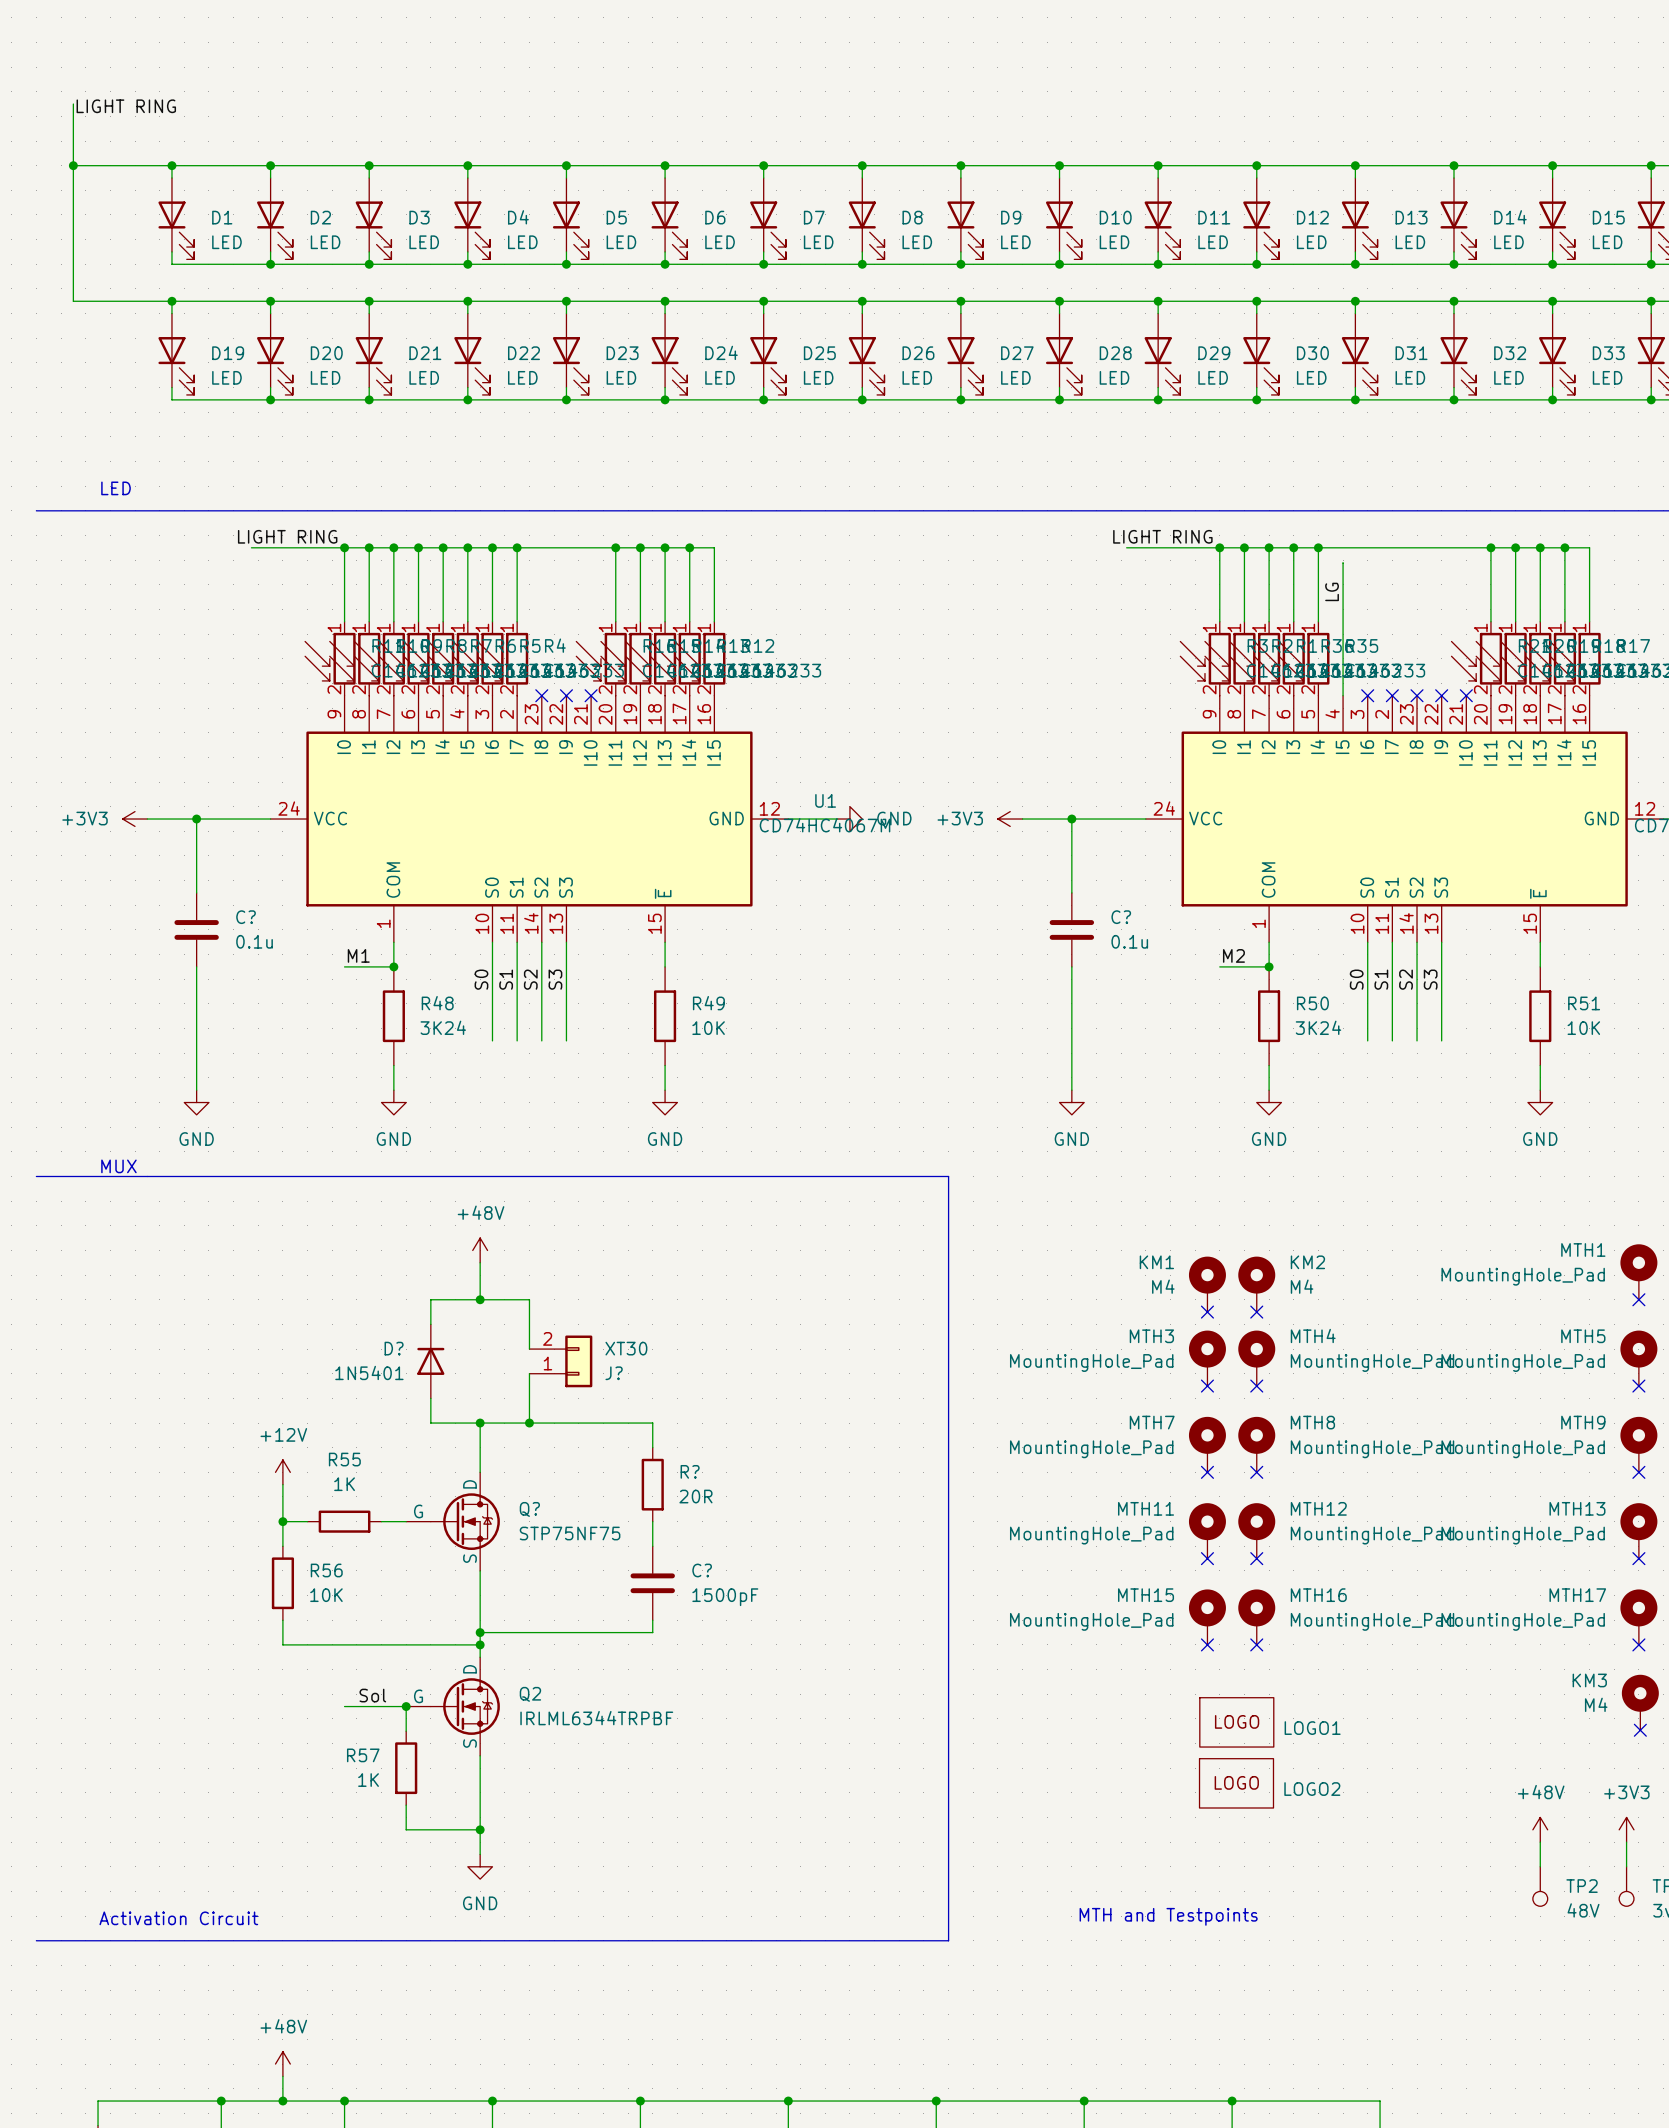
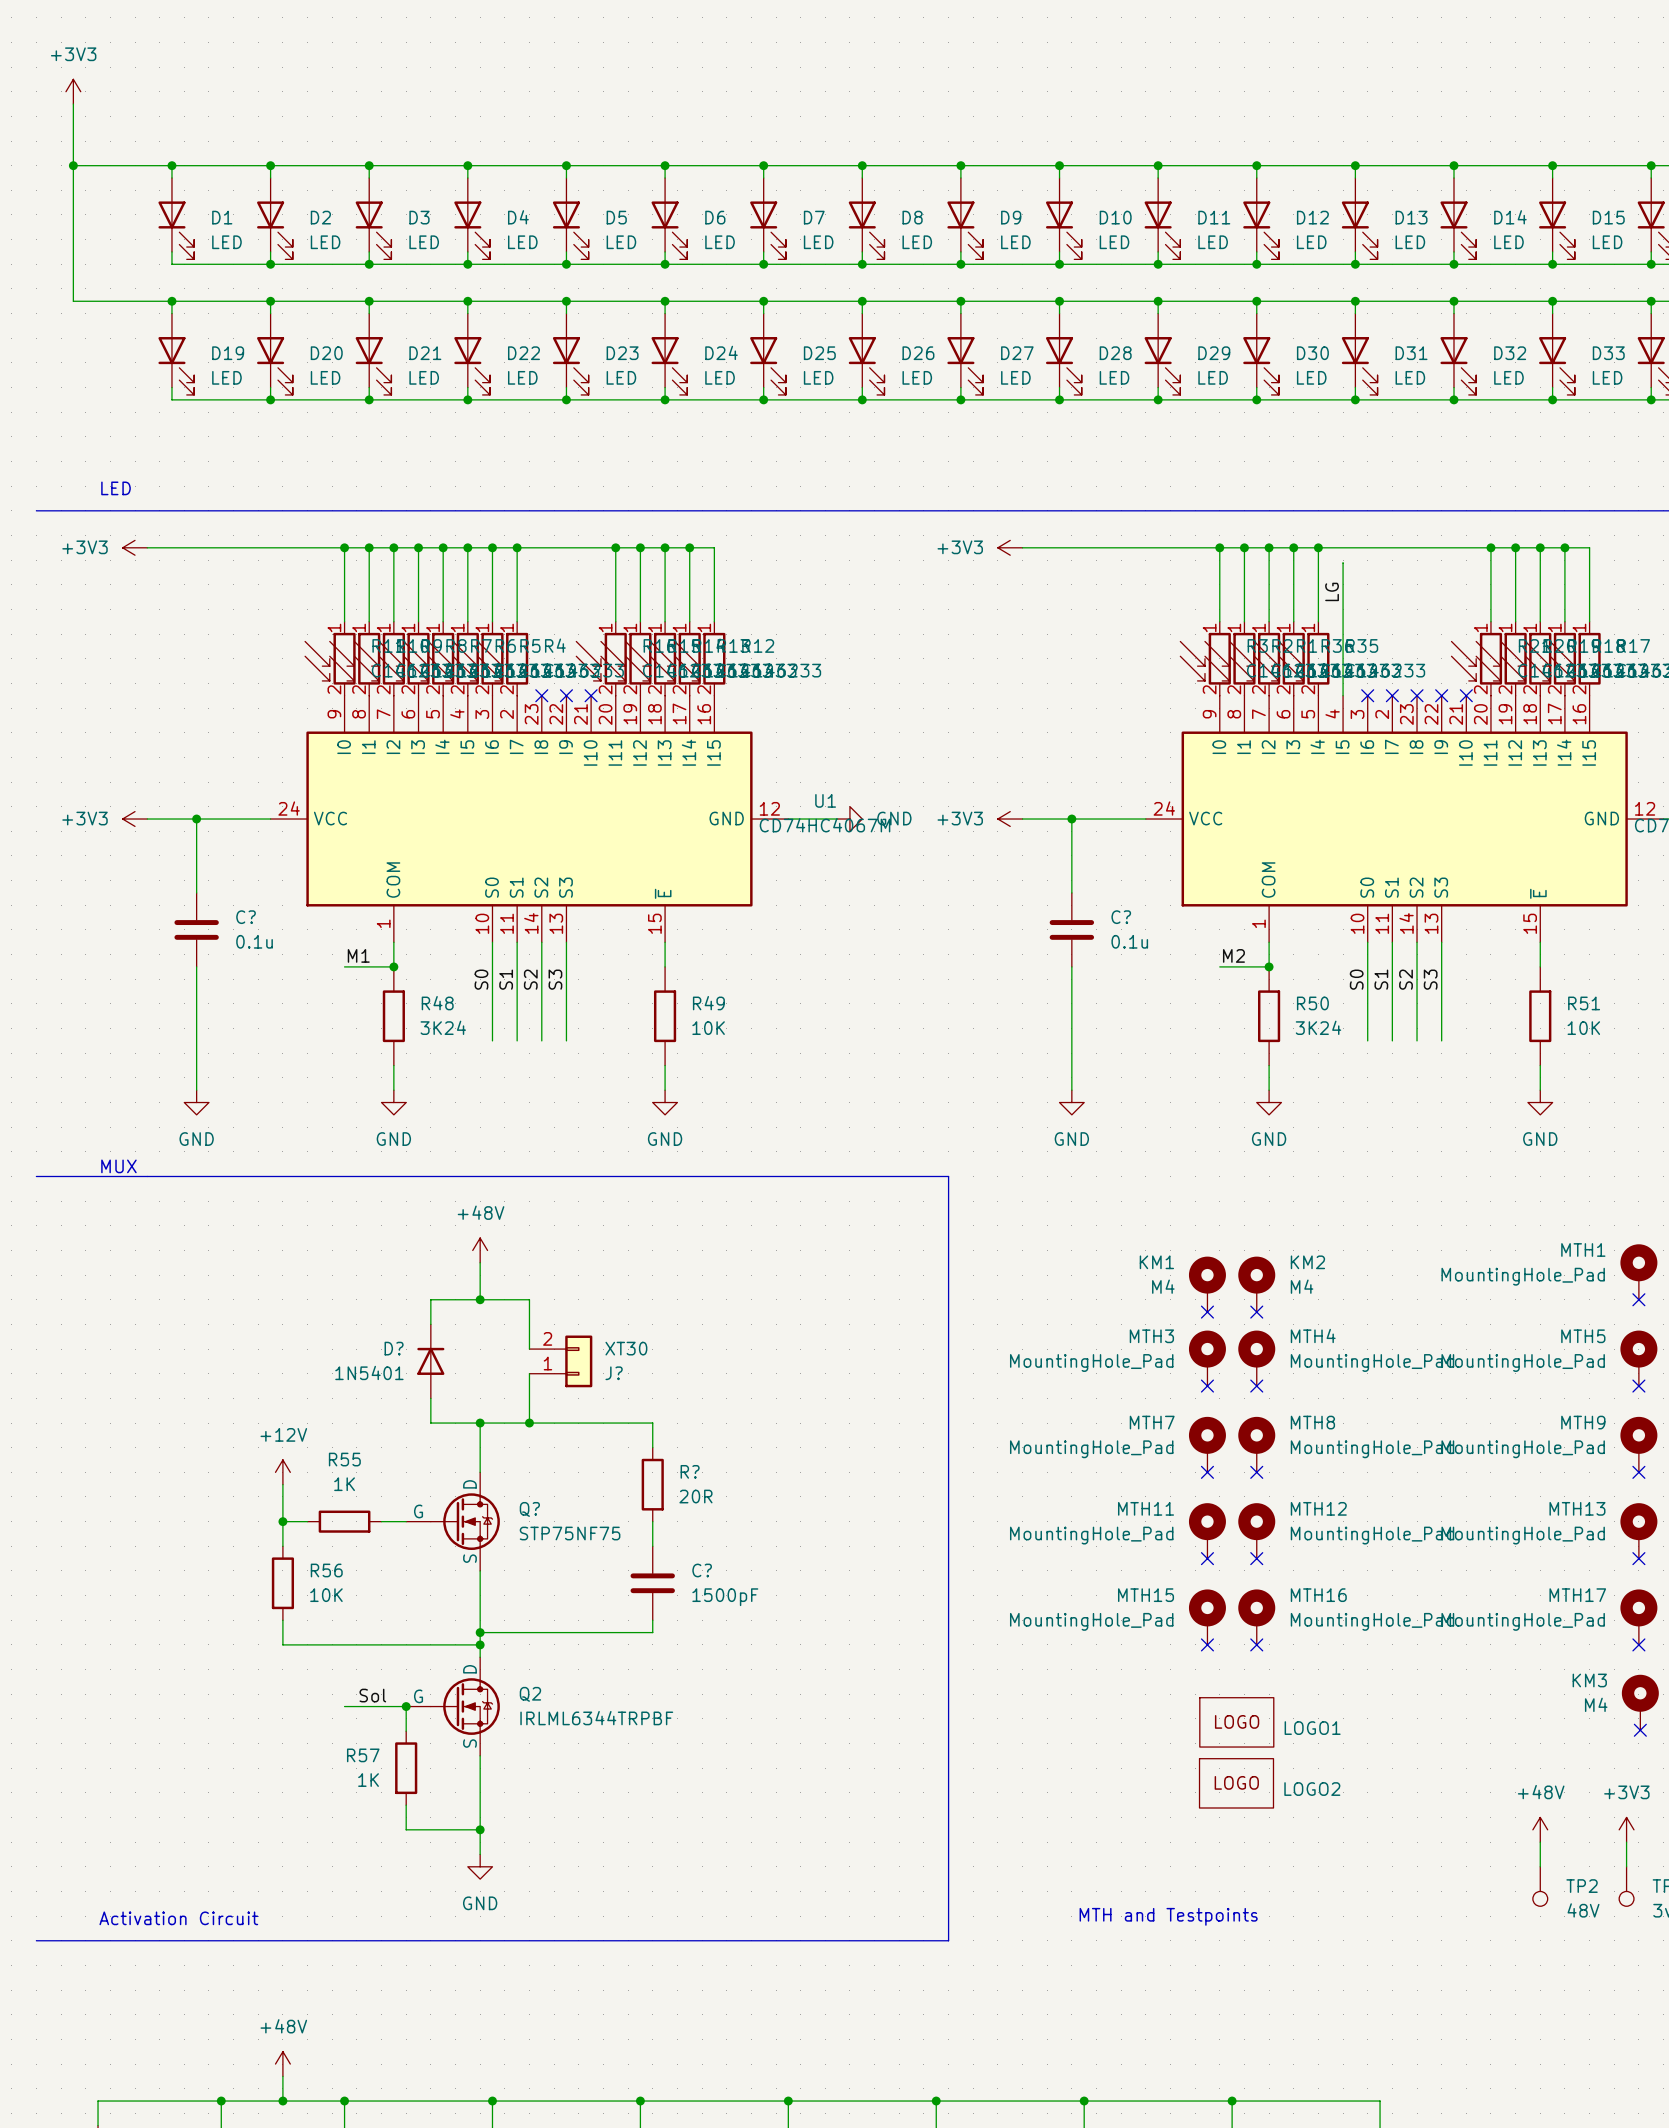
power symbol: none -> +3V3 (73, 91)
label: LIGHT RING (126, 106) -> none
label: LIGHT RING (287, 536) -> none
label: LIGHT RING (1162, 536) -> none
power symbol: none -> +3V3 (135, 547)
wire: none -> (147, 547) (251, 547)
power symbol: none -> +3V3 (1010, 547)
wire: none -> (1022, 547) (1126, 547)

